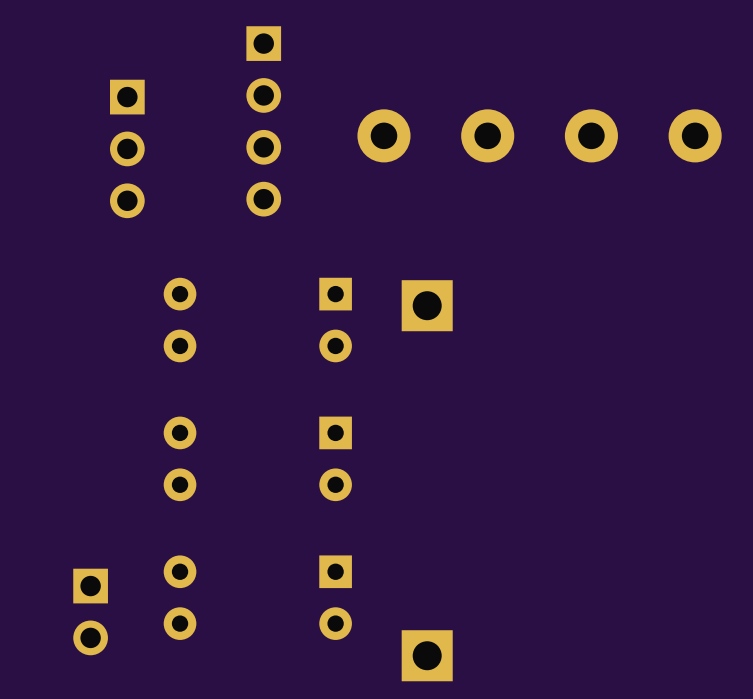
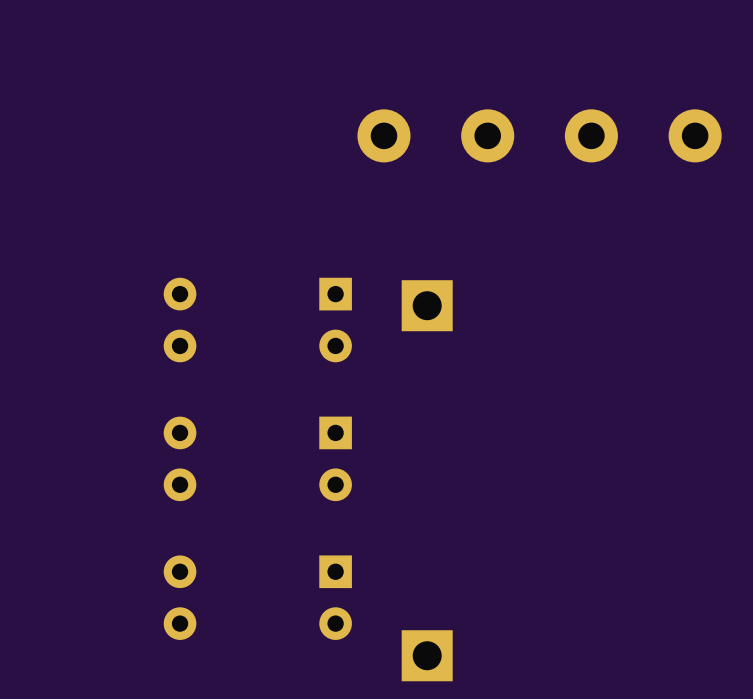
part: (263, 121) -> none
part: (127, 148) -> none
part: (90, 611) -> none

